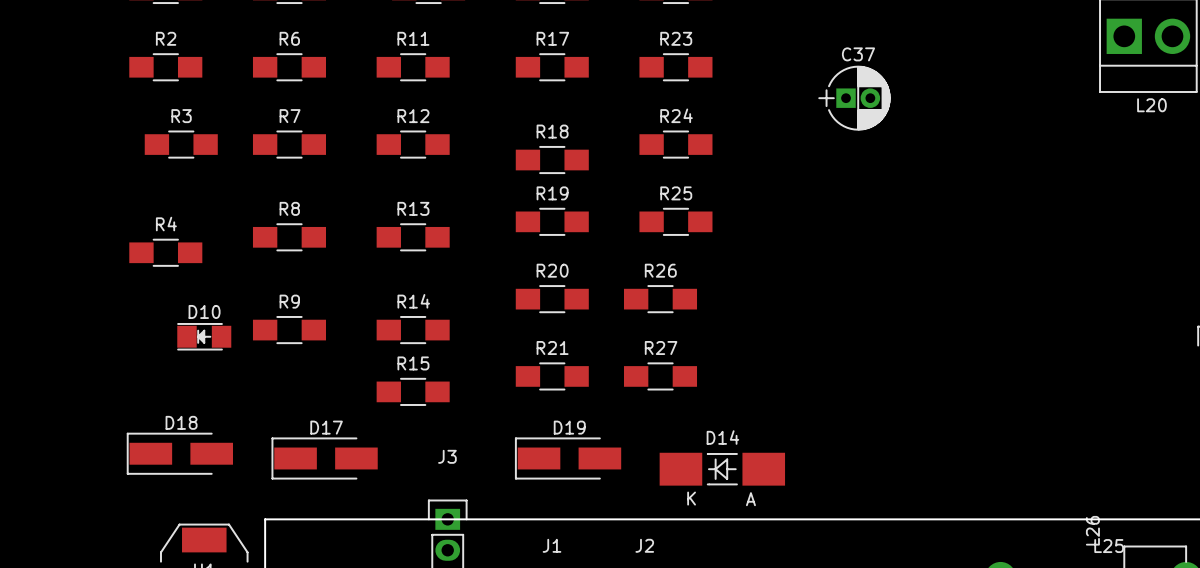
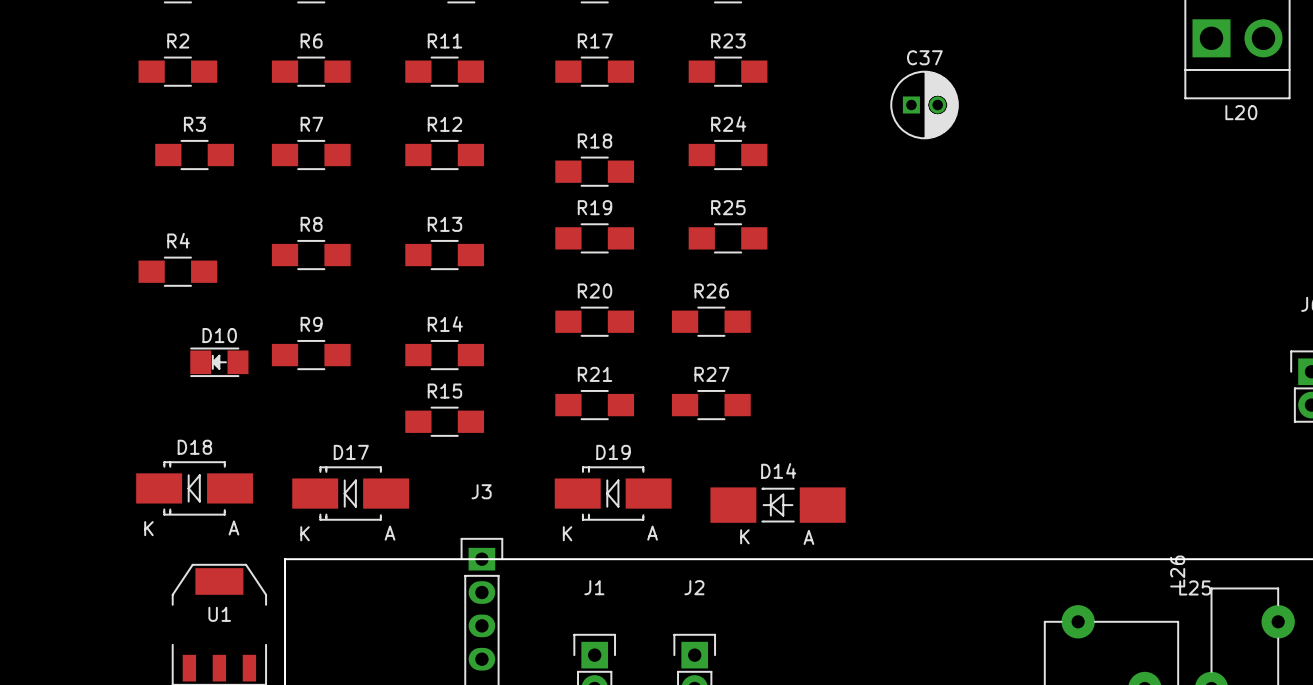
C37 footprint: [818, 65, 891, 131] -> [890, 70, 959, 140]
D18 footprint: [126, 432, 234, 475] -> [136, 461, 253, 516]
D17 footprint: [271, 437, 378, 480] -> [292, 466, 410, 521]
D19 footprint: [515, 437, 622, 480] -> [554, 466, 672, 521]

